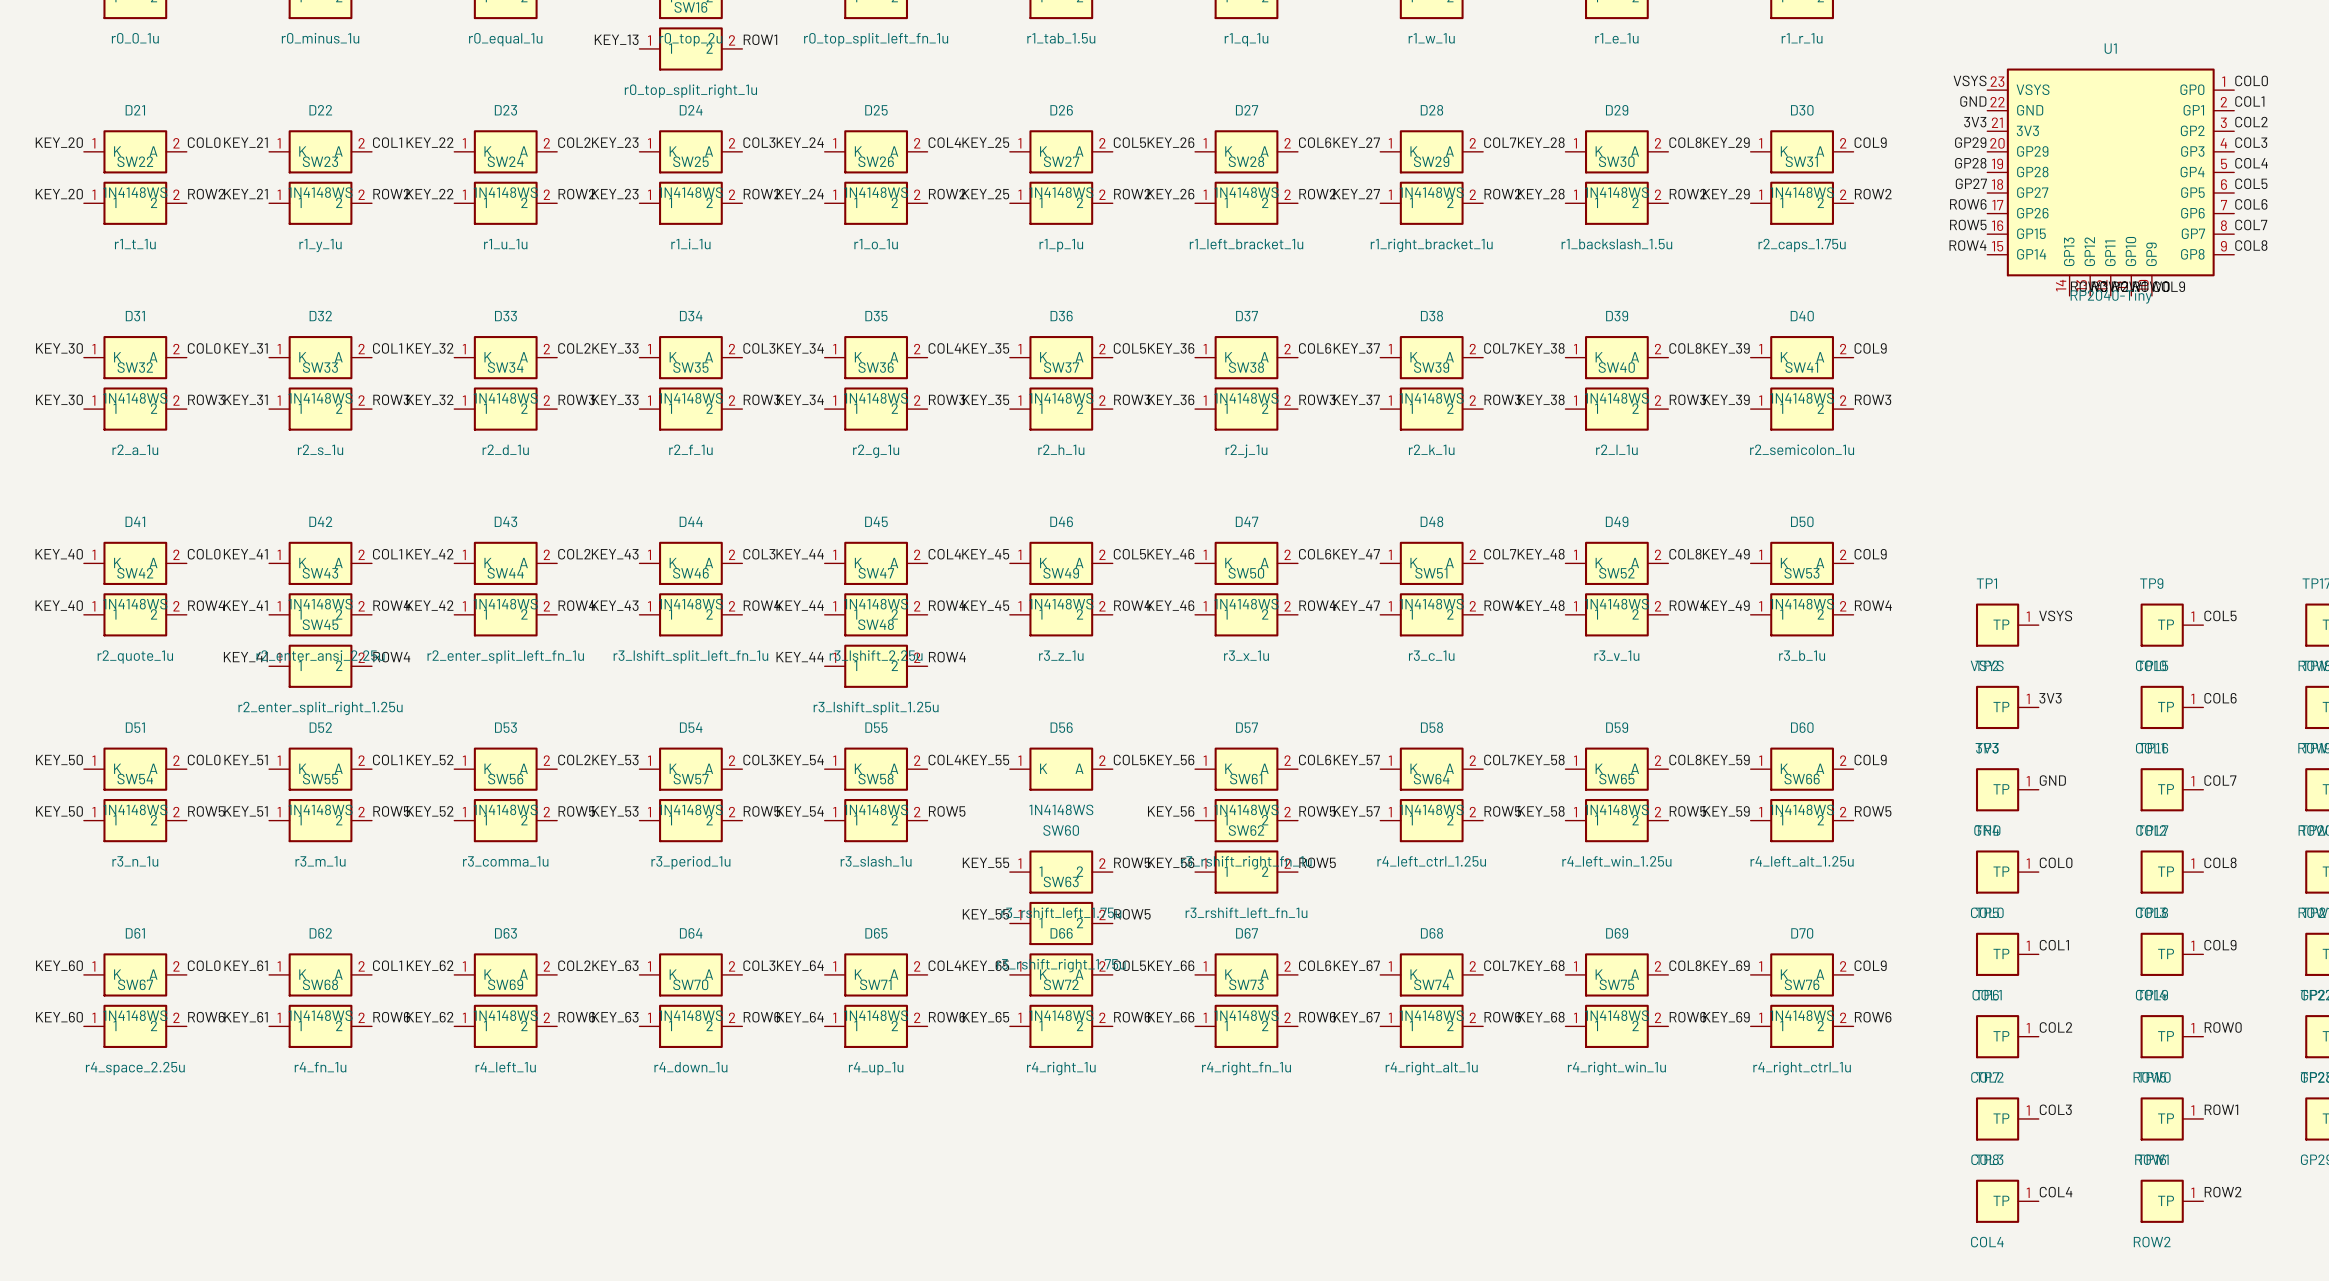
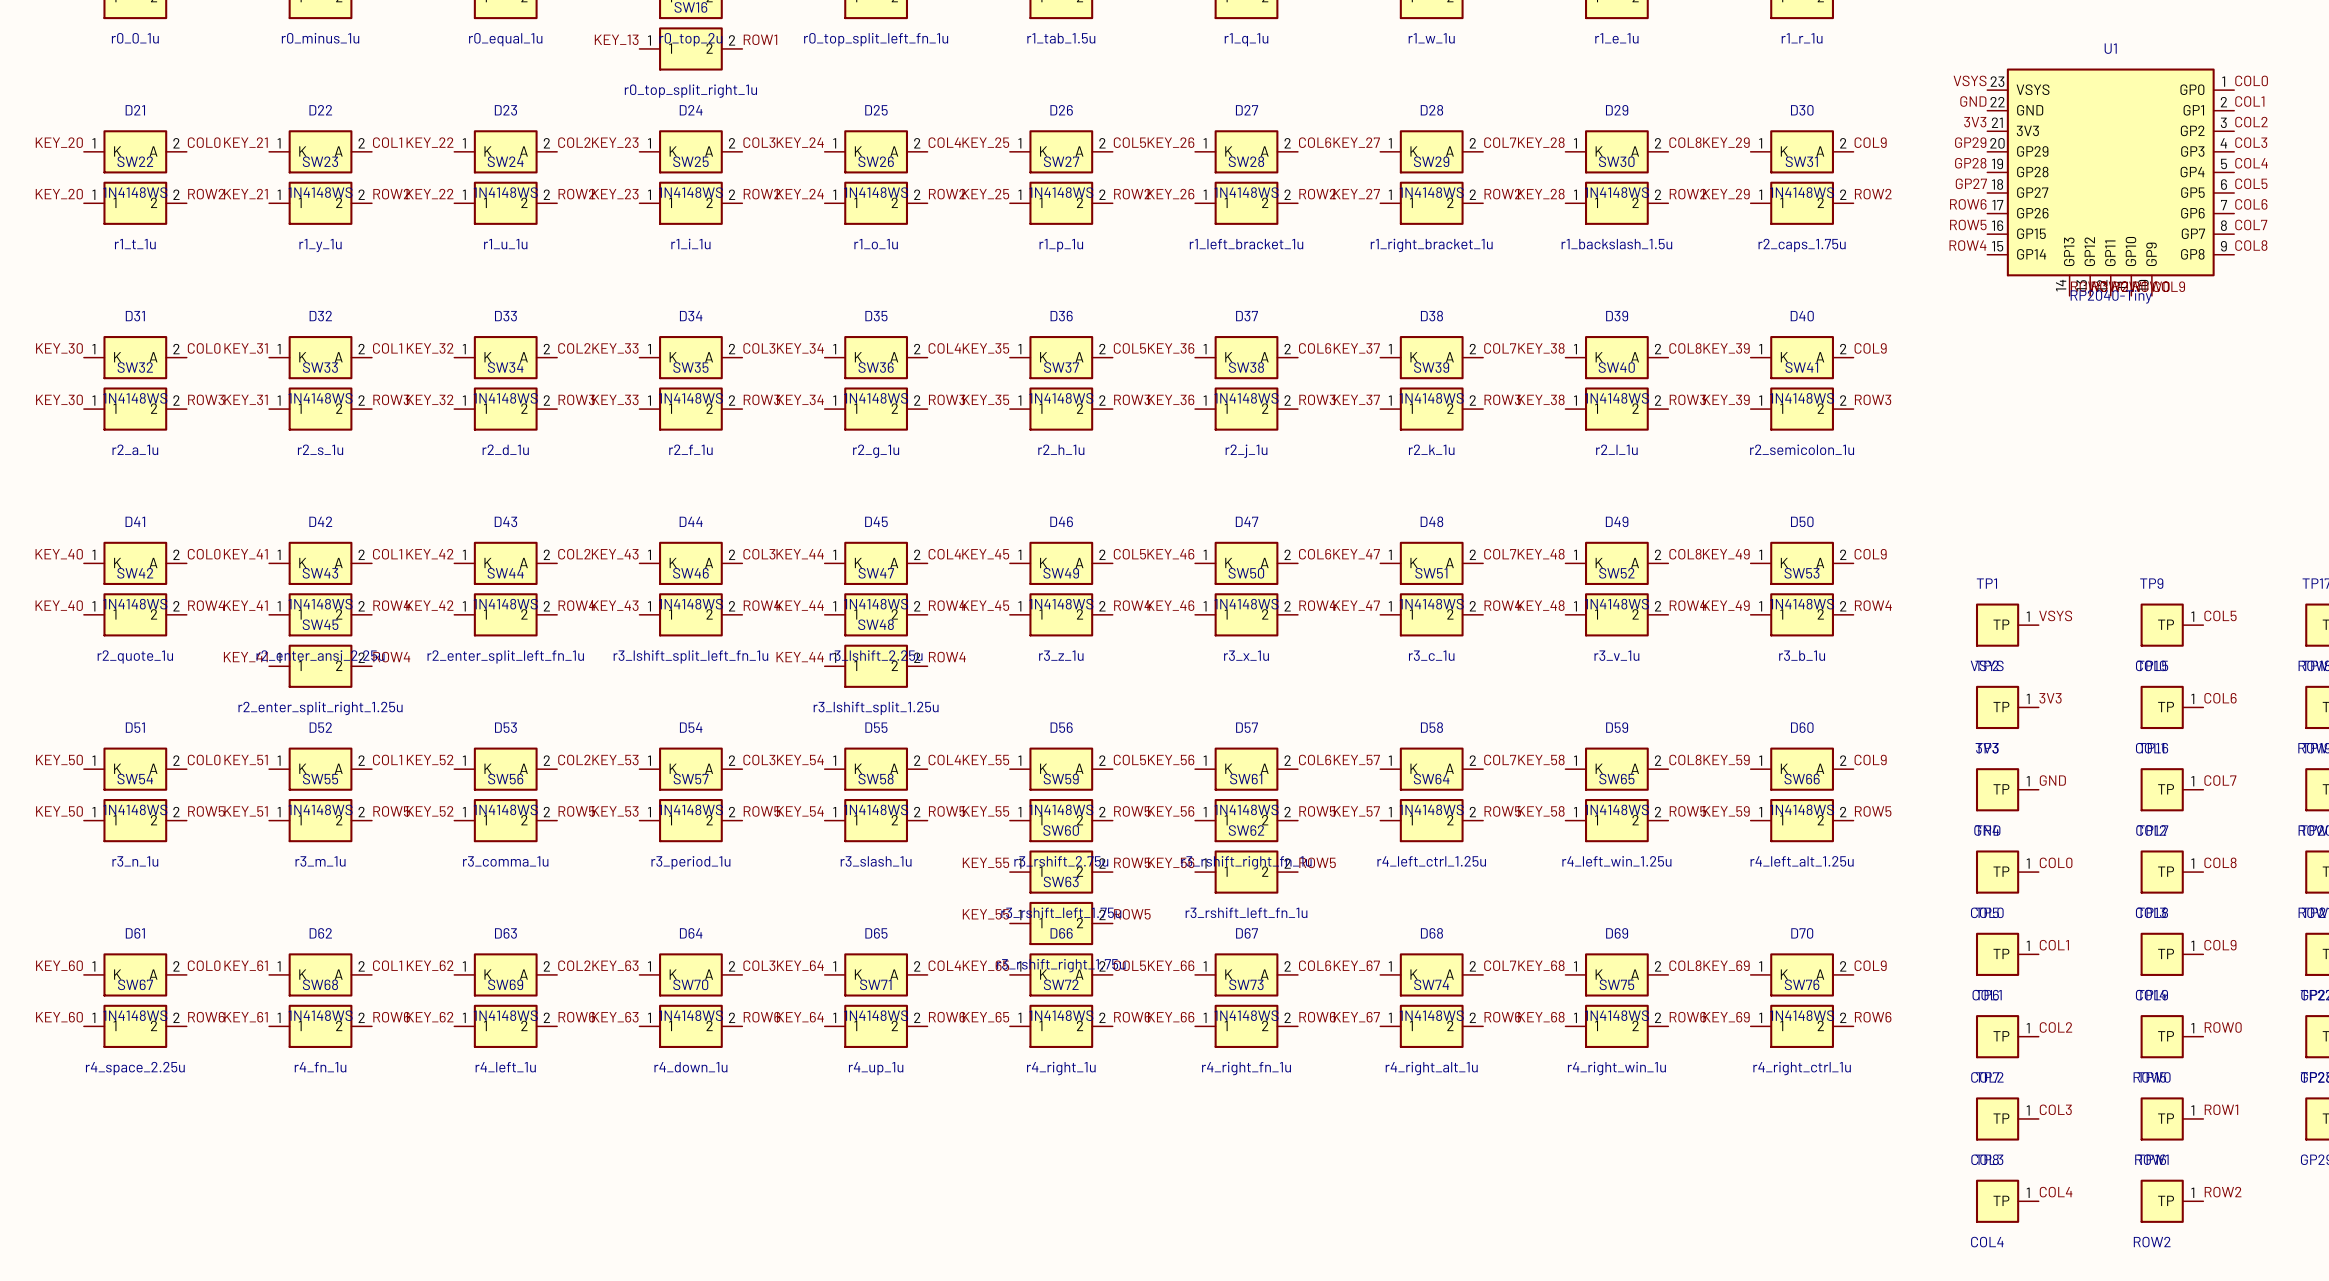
label: none -> KEY_55 (985, 811)
label: none -> ROW5 (1132, 811)
SW59: none -> r3_rshift_2.75u (1061, 820)

